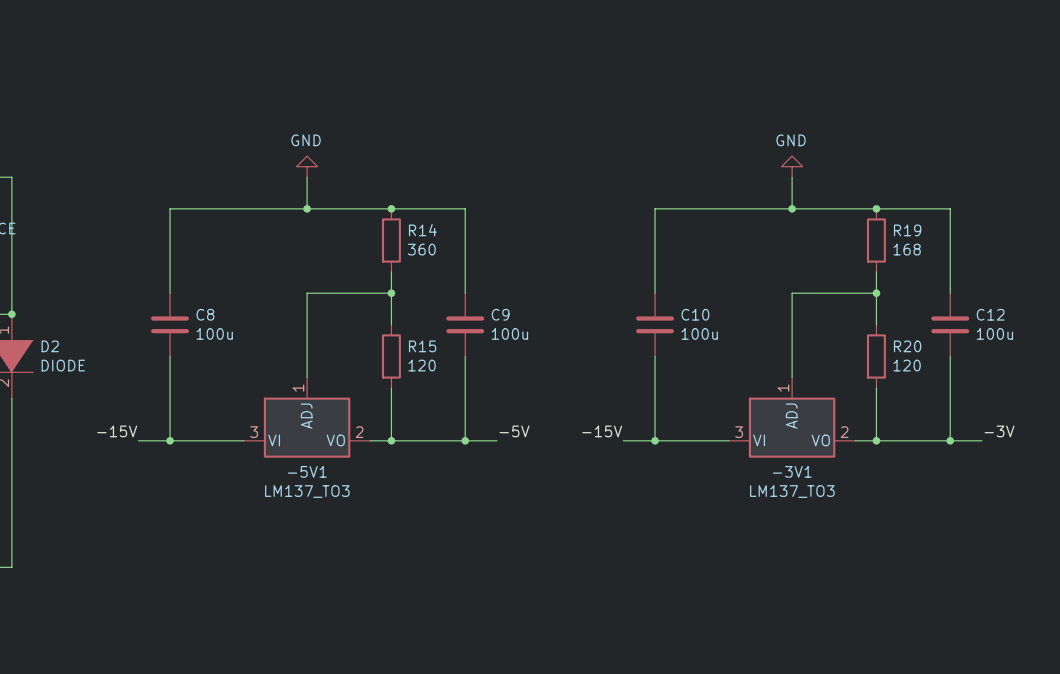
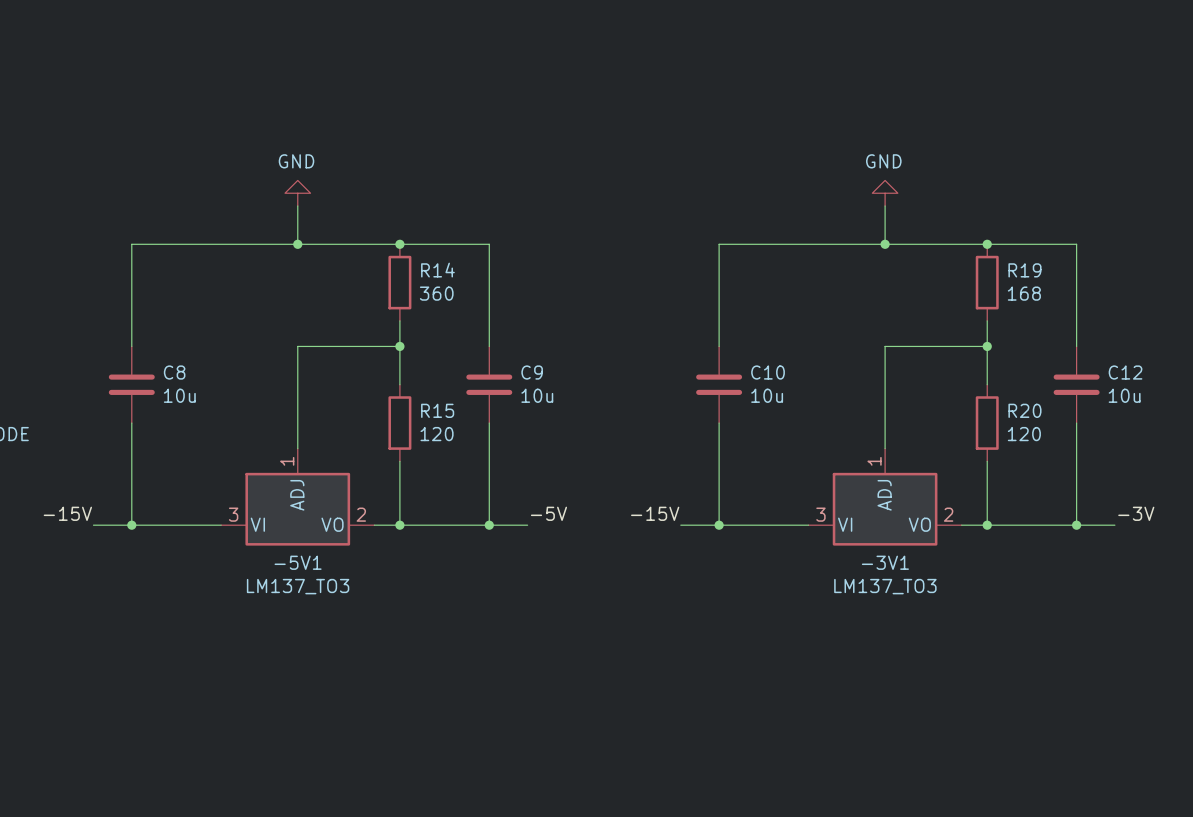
C8 value: 100u (214, 333) -> 10u (179, 395)
C9 value: 100u (509, 333) -> 10u (537, 395)
C10 value: 100u (699, 333) -> 10u (767, 395)
C12 value: 100u (994, 333) -> 10u (1124, 395)

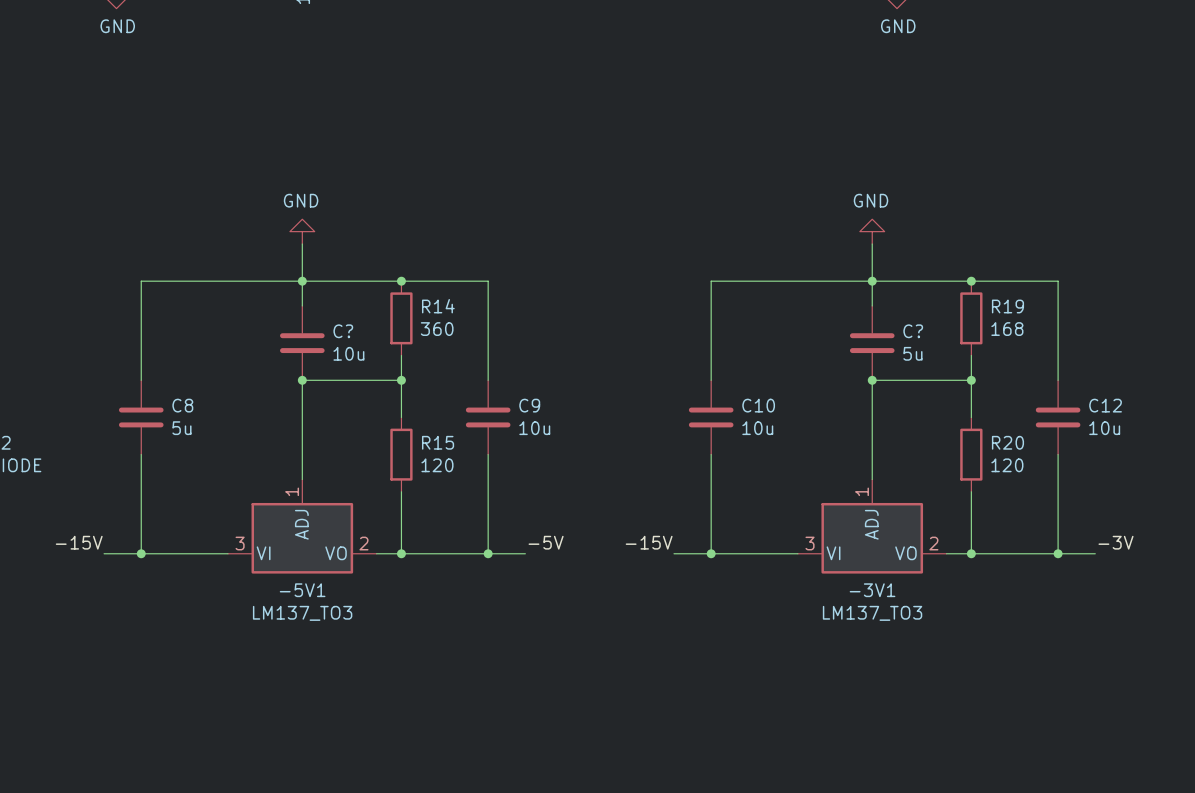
wire: none -> (302, 281) (302, 305)
wire: none -> (872, 281) (872, 305)
C?: none -> 10u (302, 343)
C?: none -> 5u (872, 343)
junction: none -> (302, 380)
junction: none -> (872, 380)
C8 value: 10u (179, 395) -> 5u (181, 428)

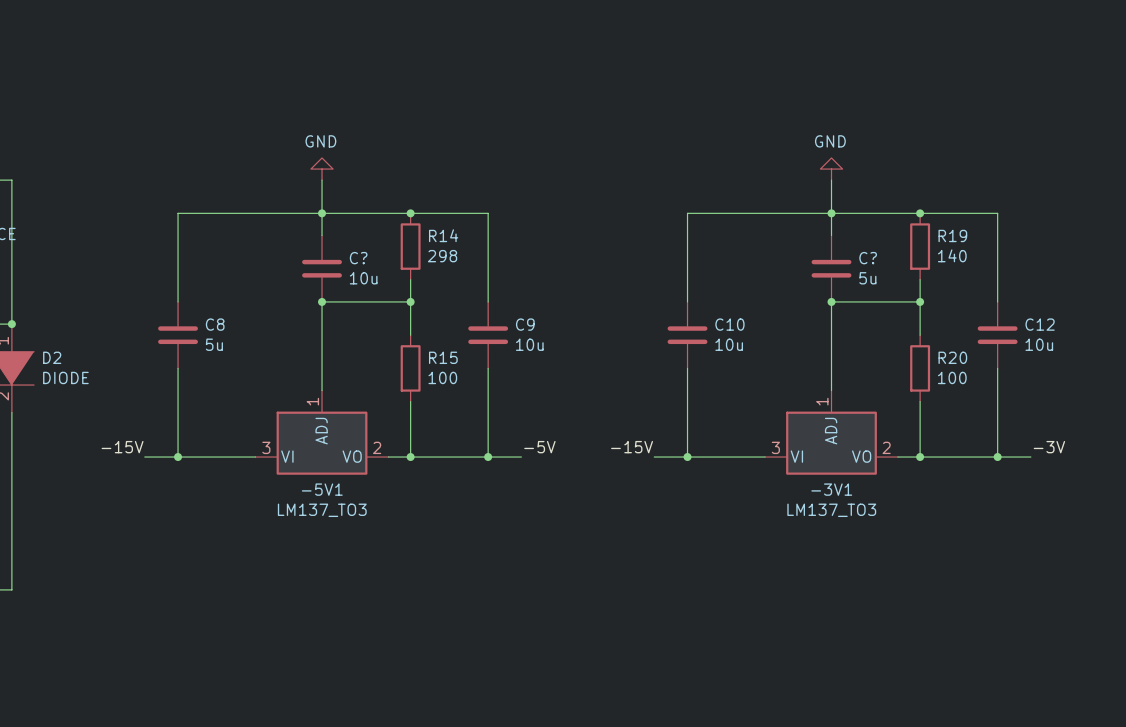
R14 value: 360 (437, 329) -> 298 (442, 256)
R19 value: 168 (1007, 329) -> 140 (952, 255)
R15 value: 120 (437, 465) -> 100 (442, 377)
R20 value: 120 (1007, 465) -> 100 (952, 377)

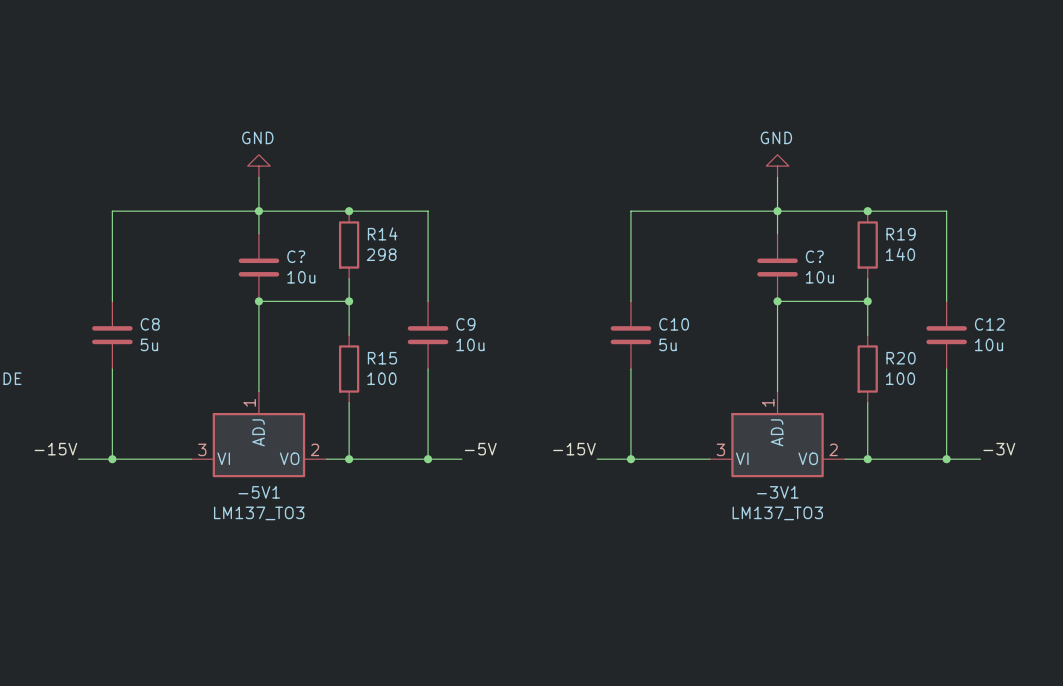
C? value: 5u (867, 278) -> 10u (819, 277)
C10 value: 10u (729, 344) -> 5u (667, 344)

